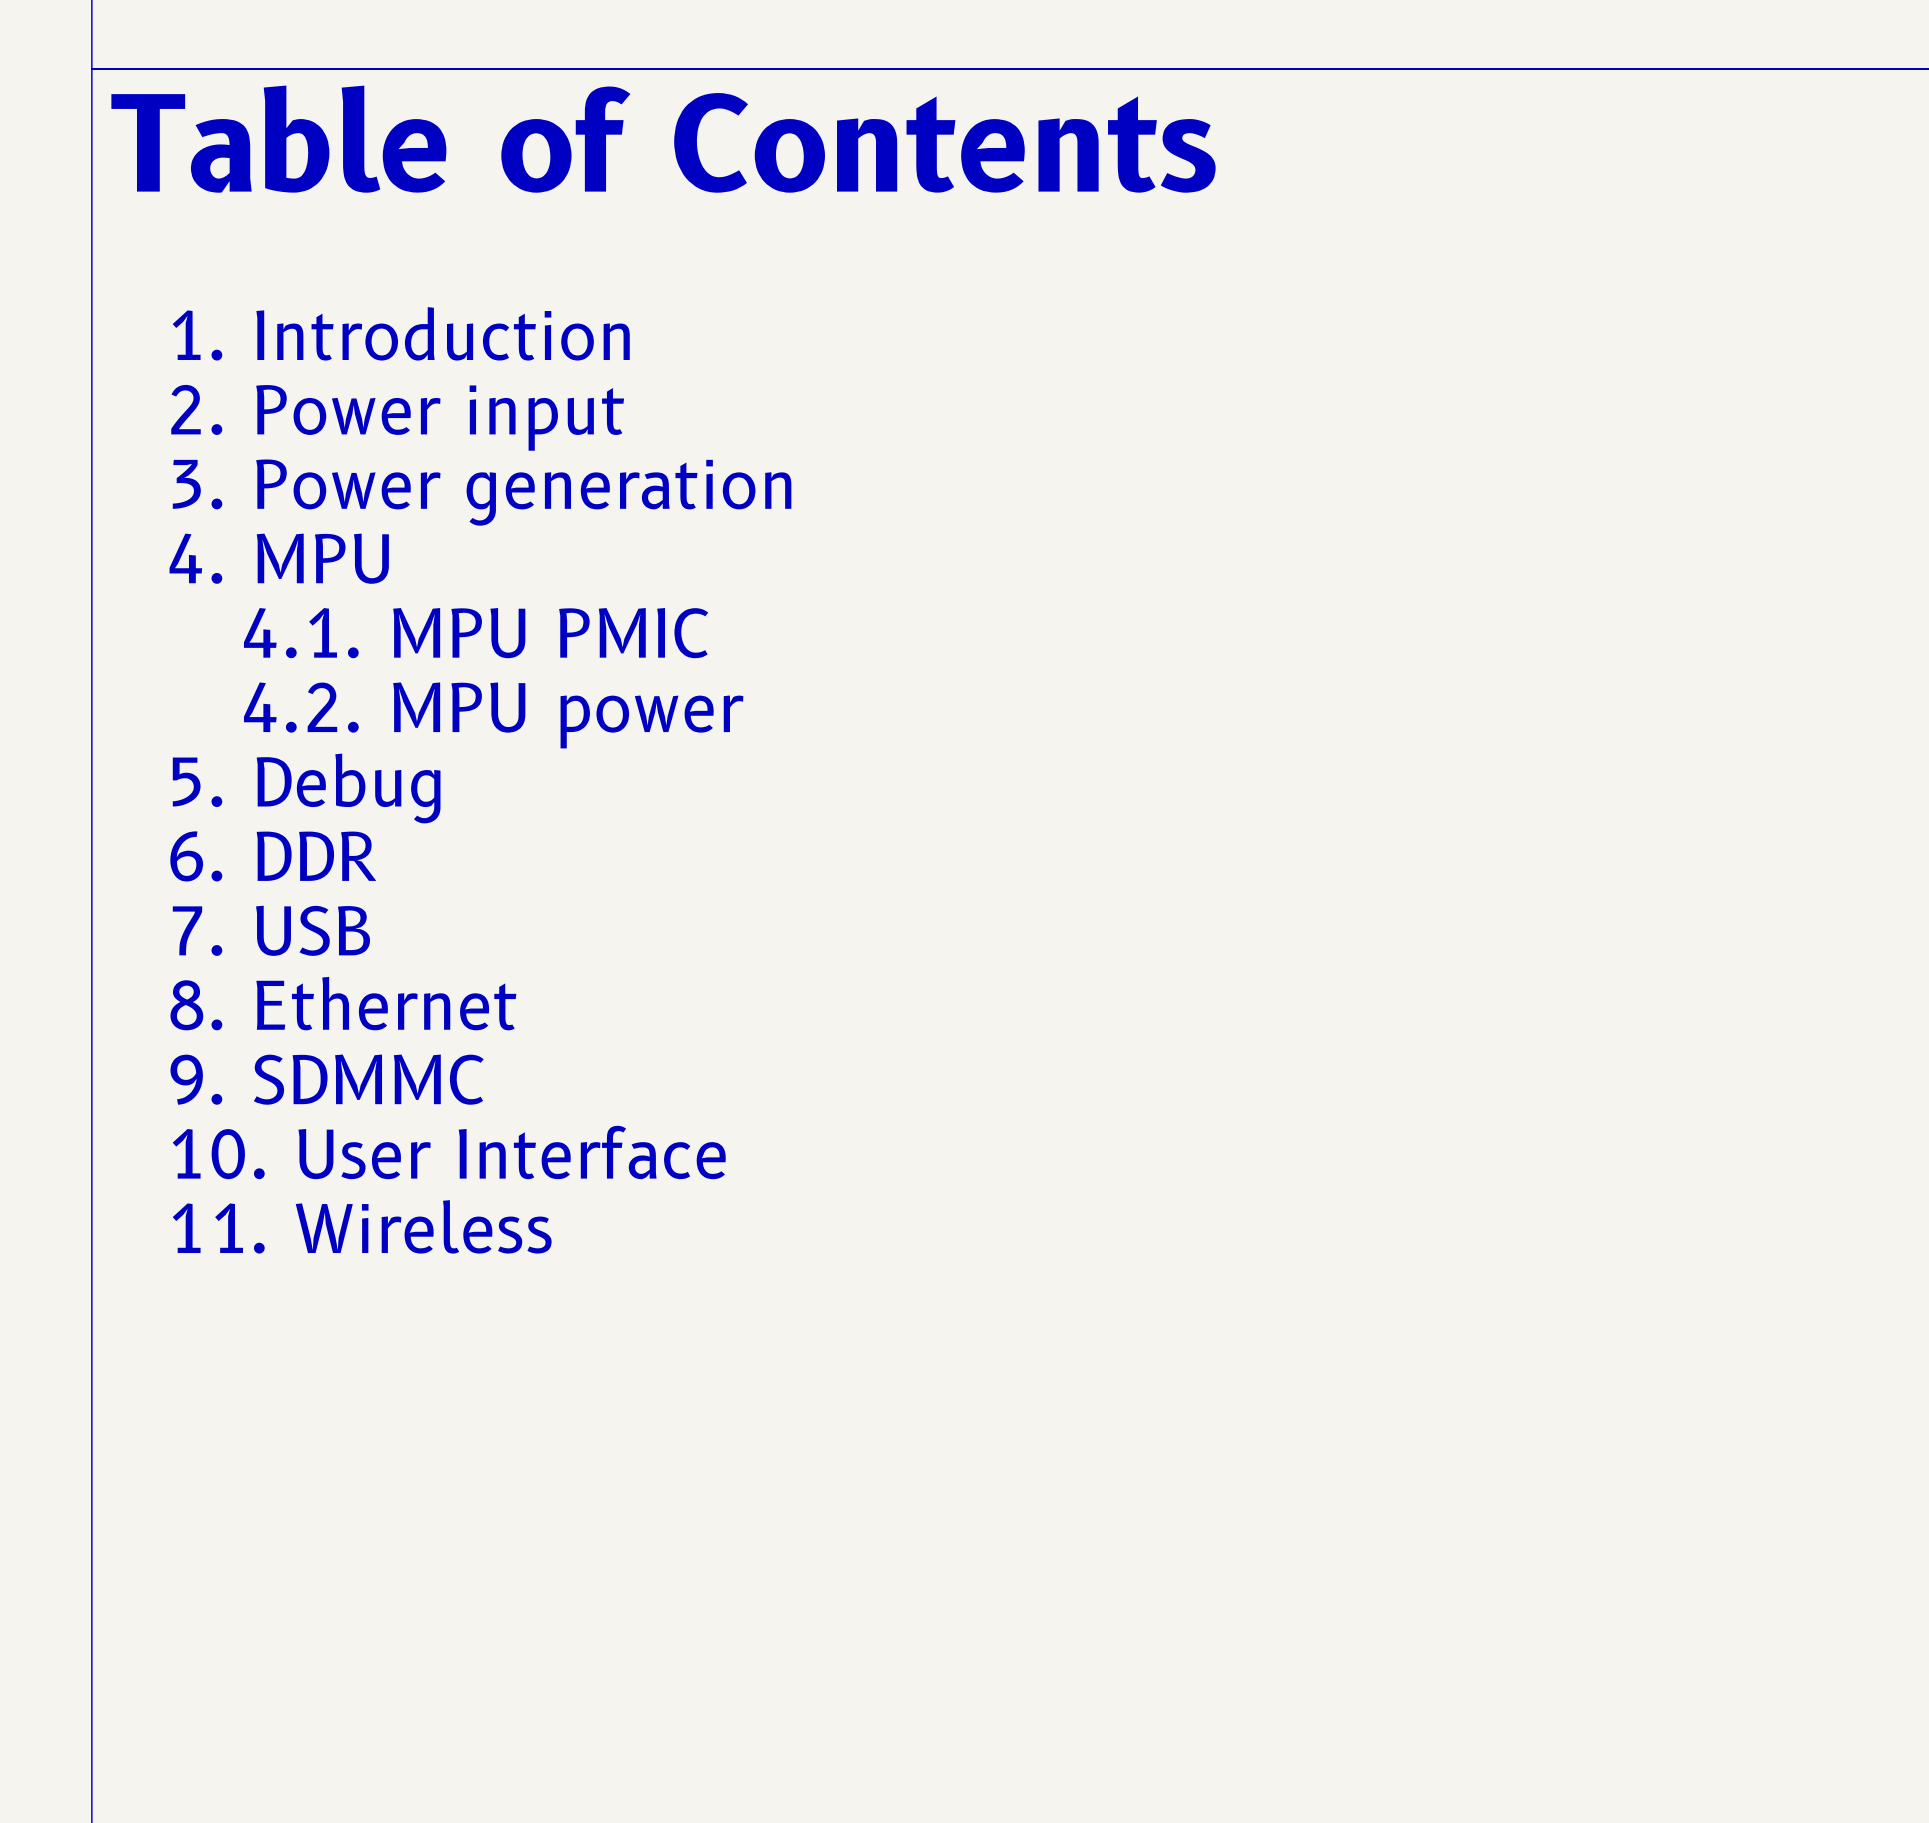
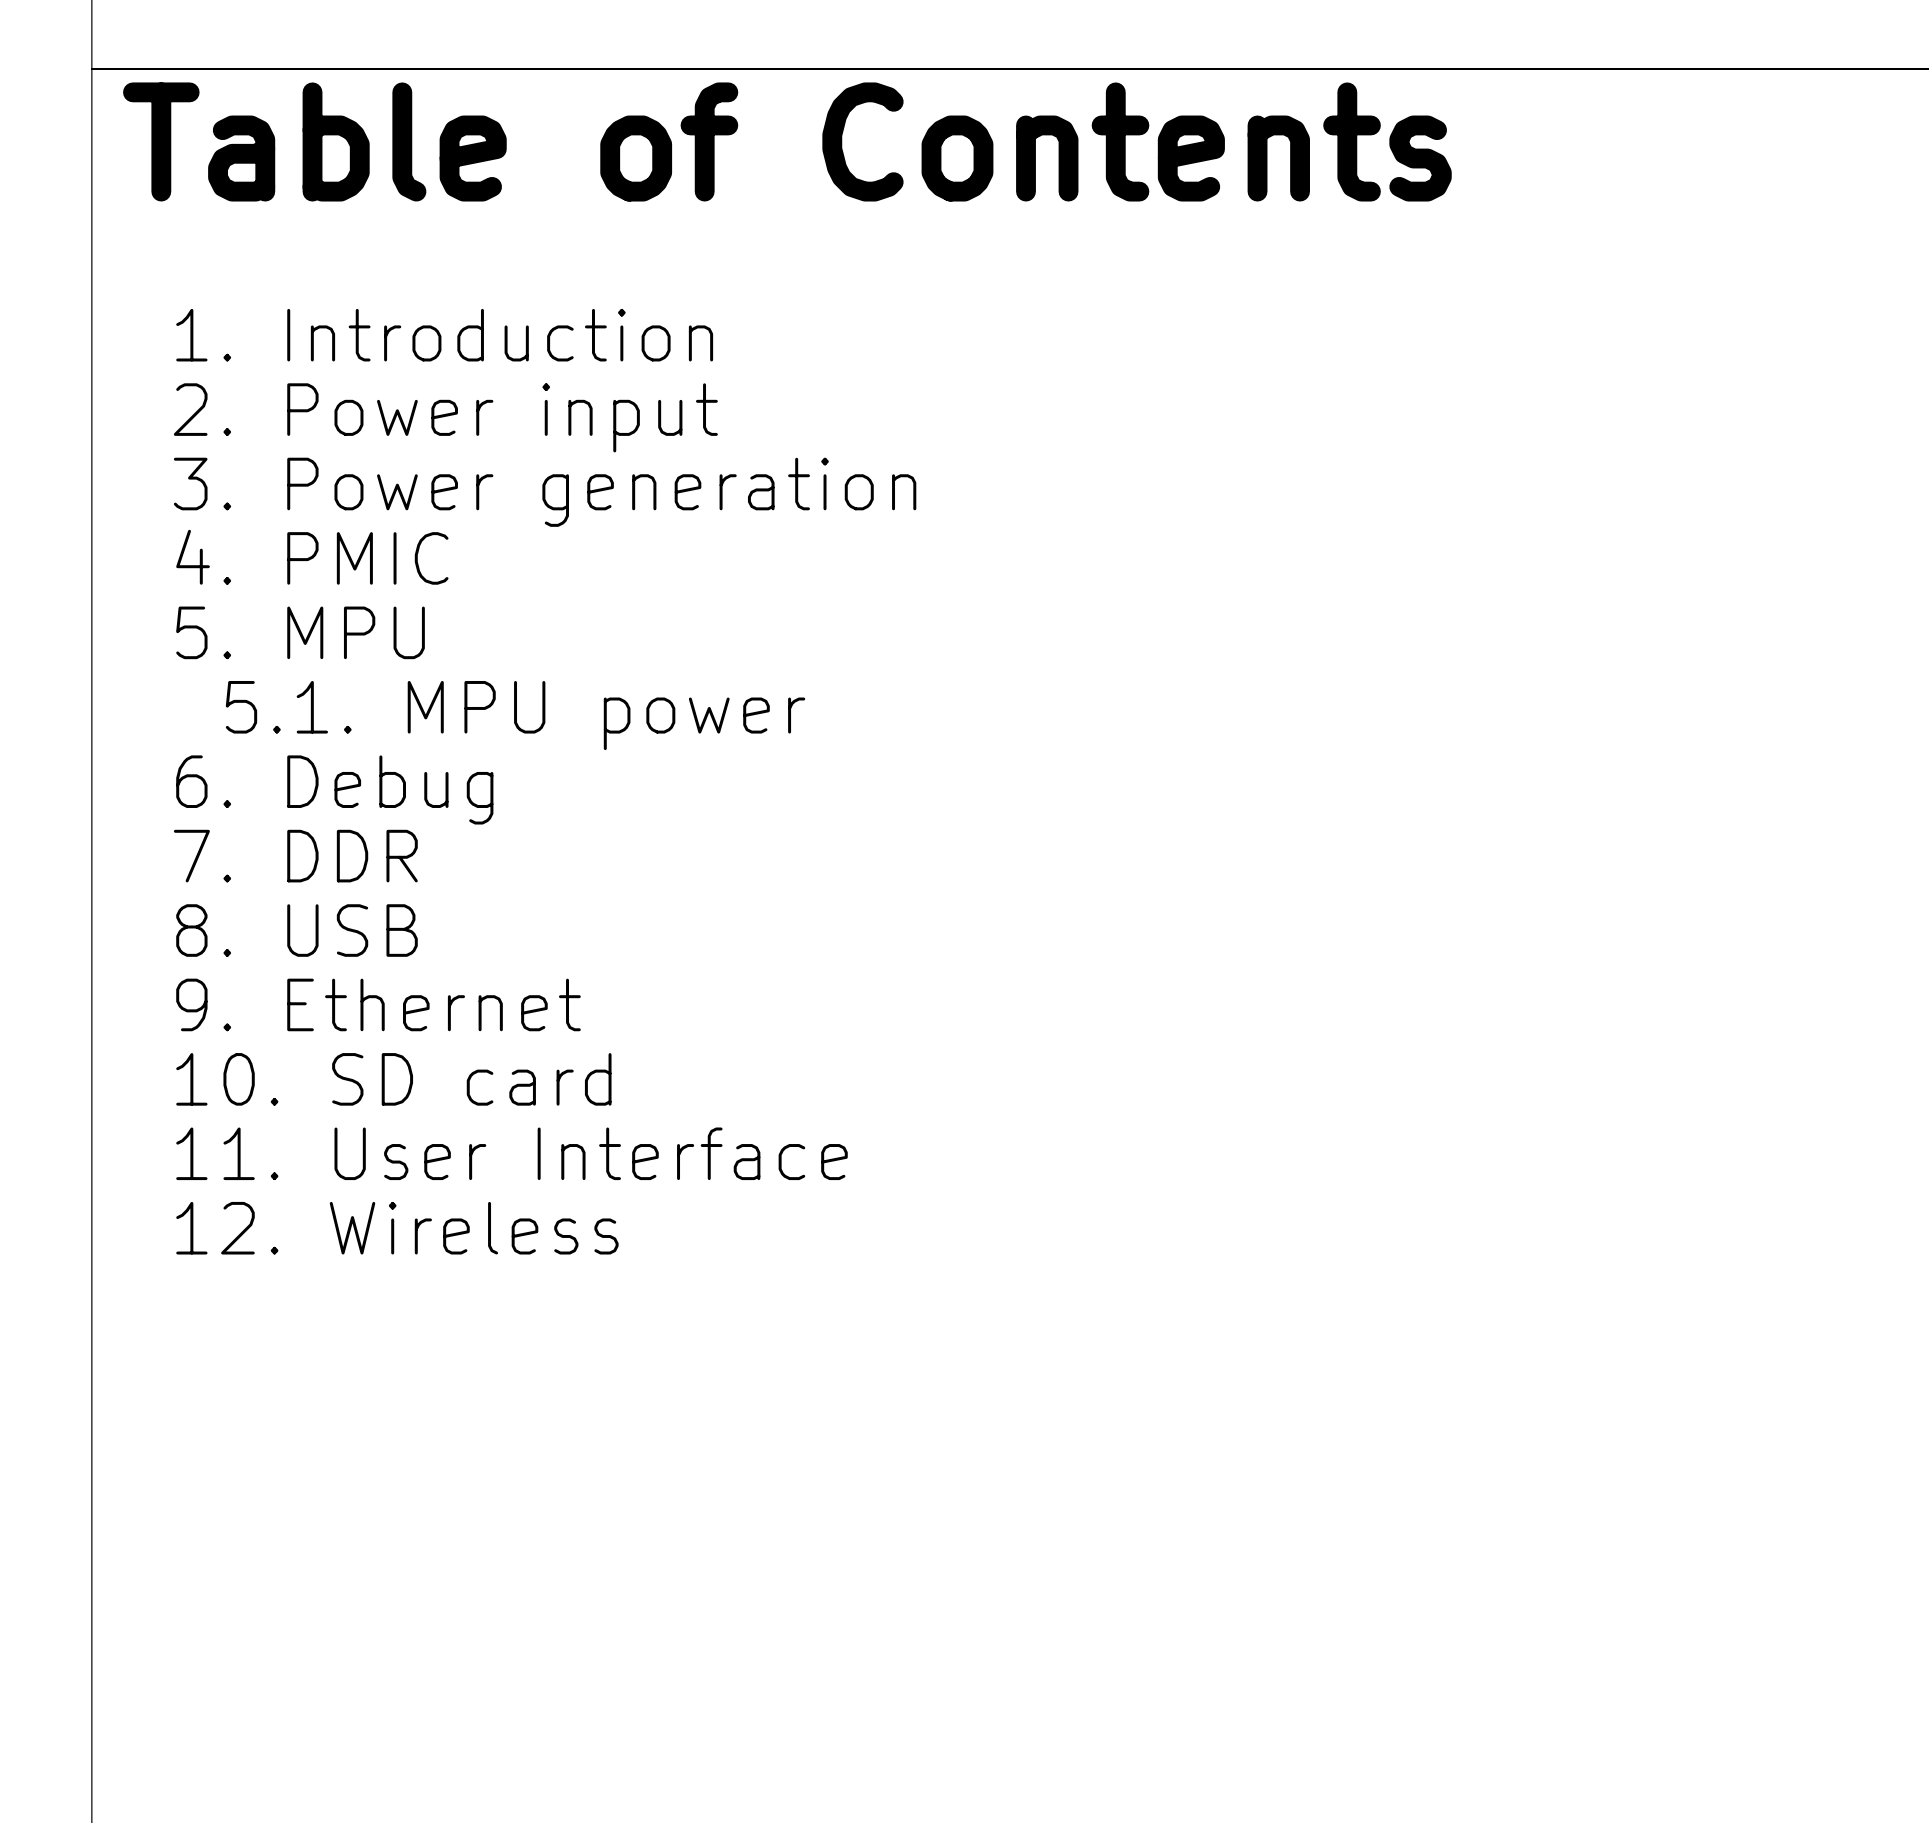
text: 4. MPU (279, 558) -> 4. PMIC (312, 557)
text: none -> 5. MPU (300, 632)
text: 4.1. MPU PMIC (476, 633) -> none
text: 4.2. MPU power (493, 715) -> 5.1. MPU power (515, 715)
text: 5. Debug (306, 788) -> 6. Debug (334, 789)
text: 6. DDR (273, 856) -> 7. DDR (295, 856)
text: 7. USB (271, 930) -> 8. USB (297, 930)
text: 8. Ethernet (343, 1003) -> 9. Ethernet (378, 1004)
text: 9. SDMMC (327, 1079) -> 10. SD card (393, 1079)
text: 10. User Interface (449, 1152) -> 11. User Interface (511, 1153)
text: 11. Wireless (362, 1226) -> 12. Wireless (397, 1228)

